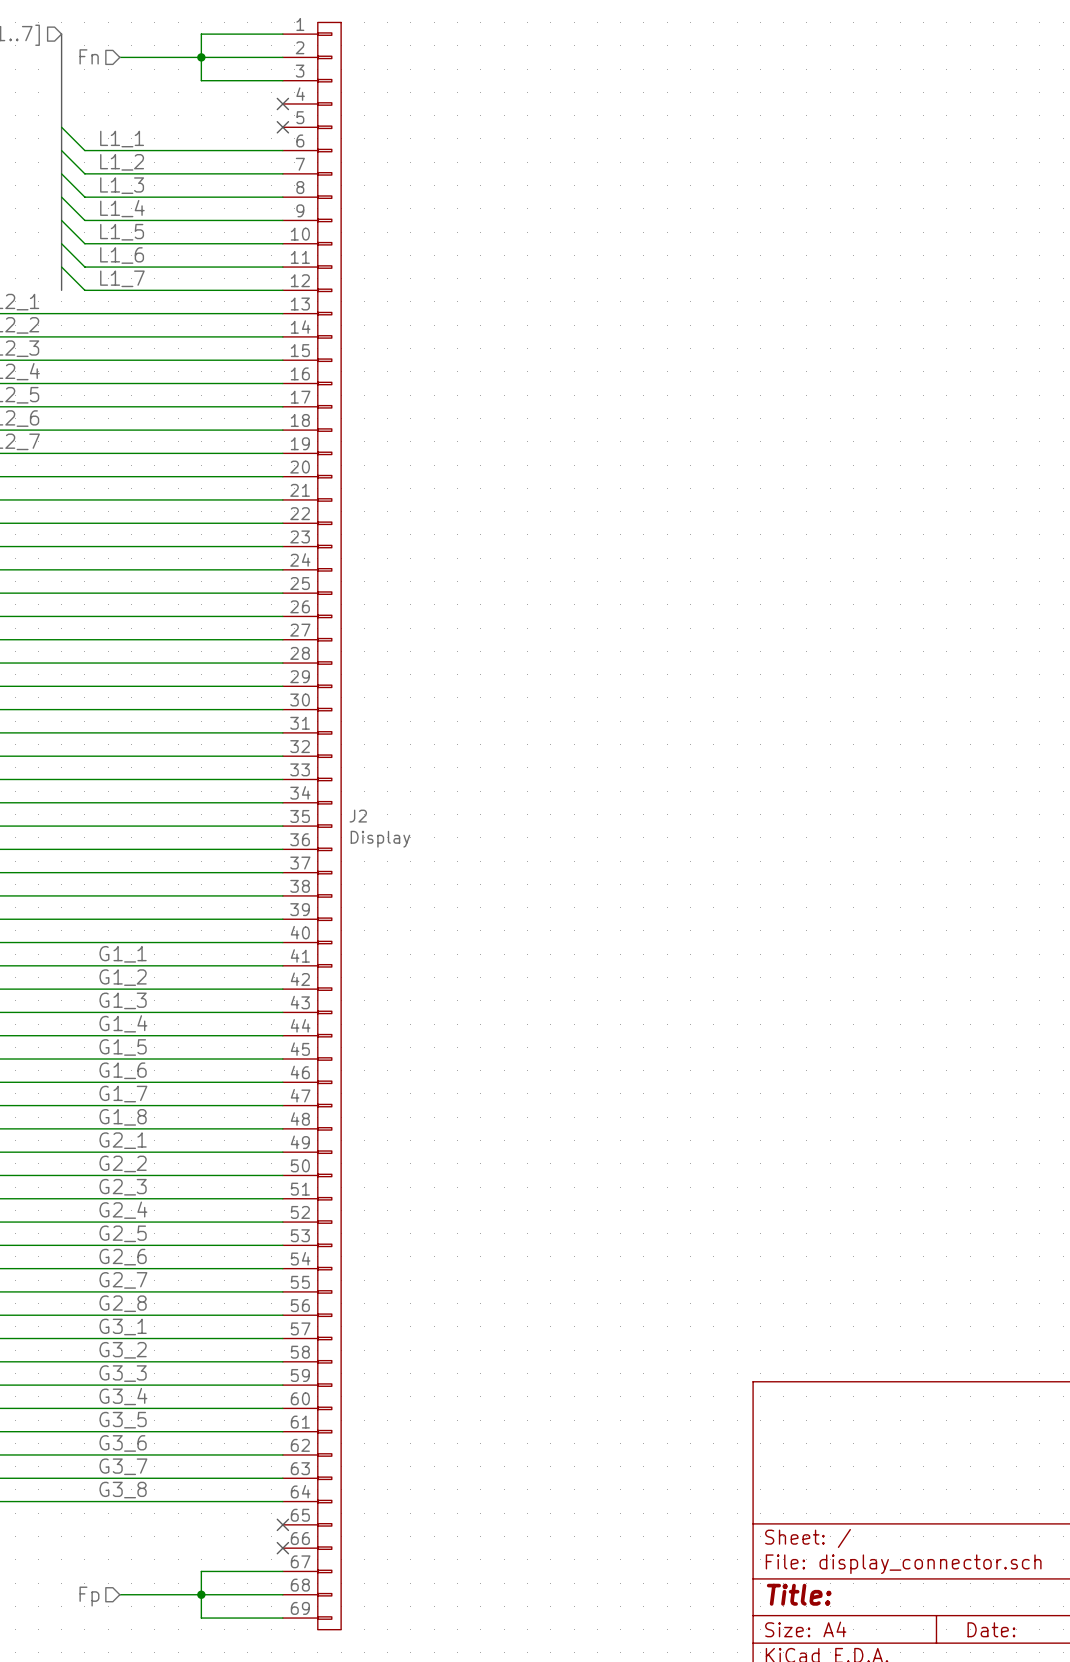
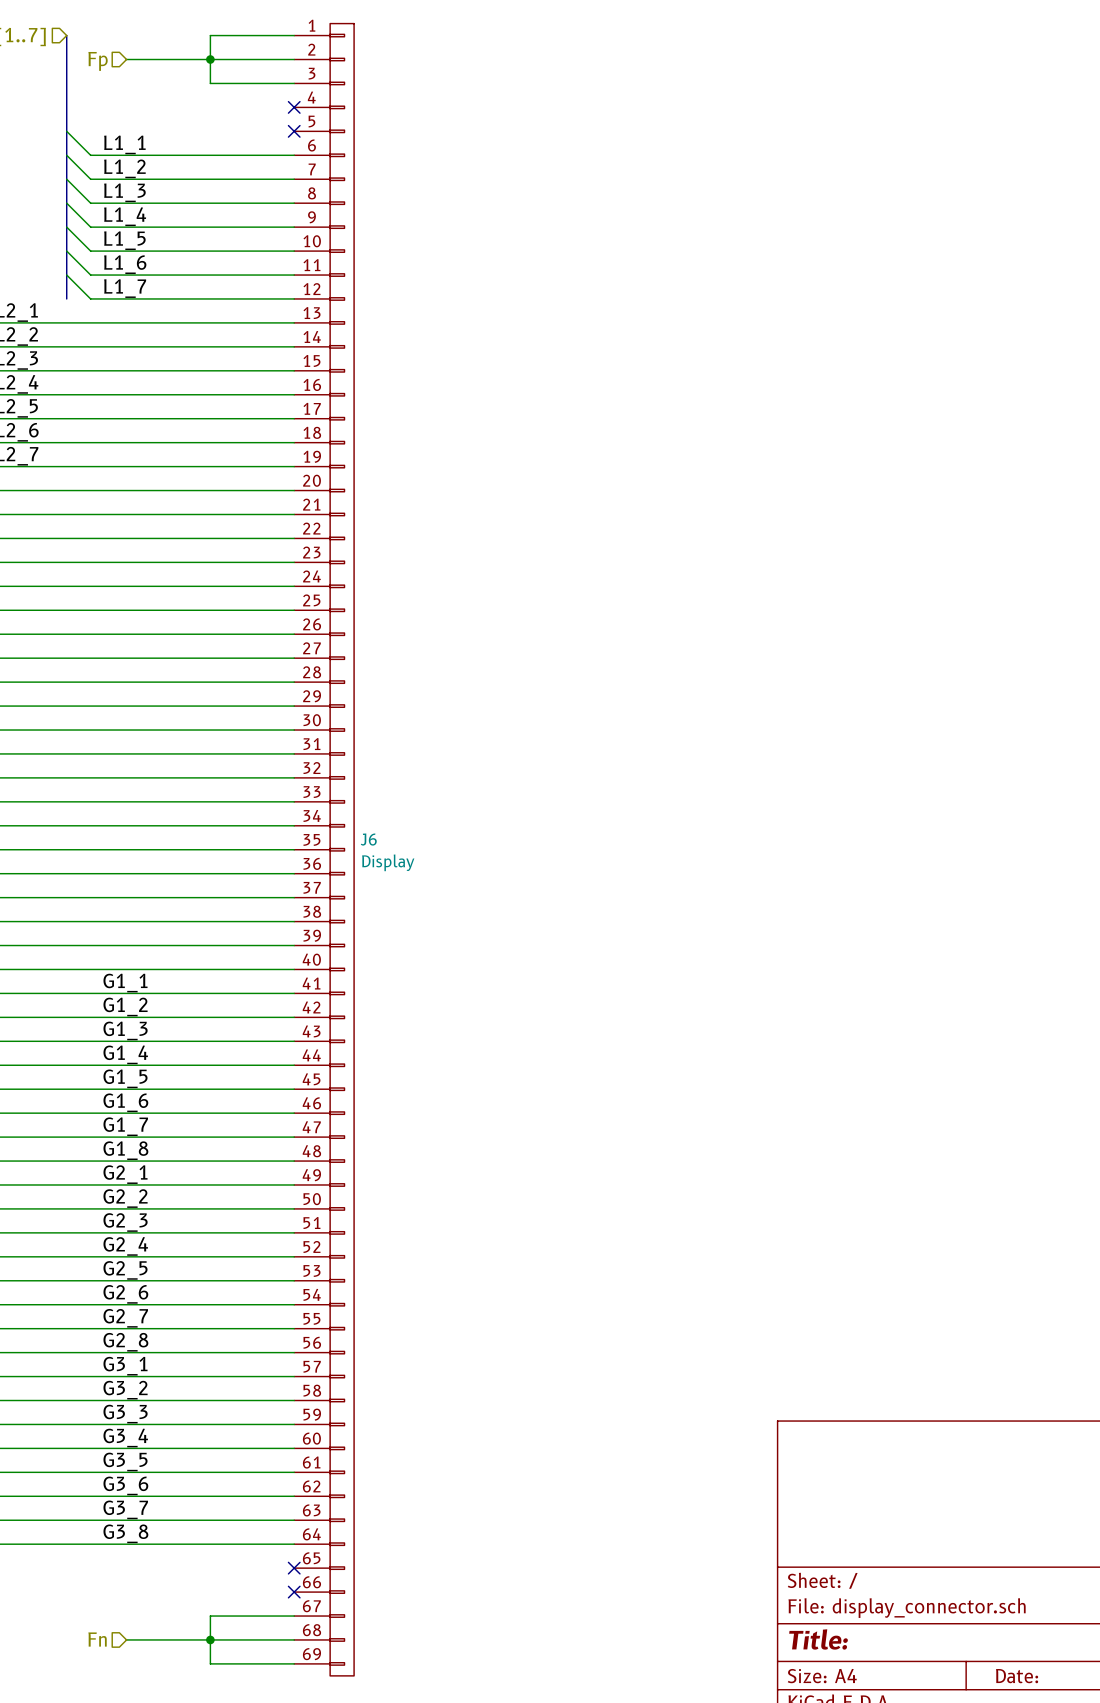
hierarchical label: Fn (89, 56) -> Fp (98, 61)
J2 name: J2 (358, 816) -> J6 (368, 839)
hierarchical label: Fp (89, 1596) -> Fn (97, 1639)

